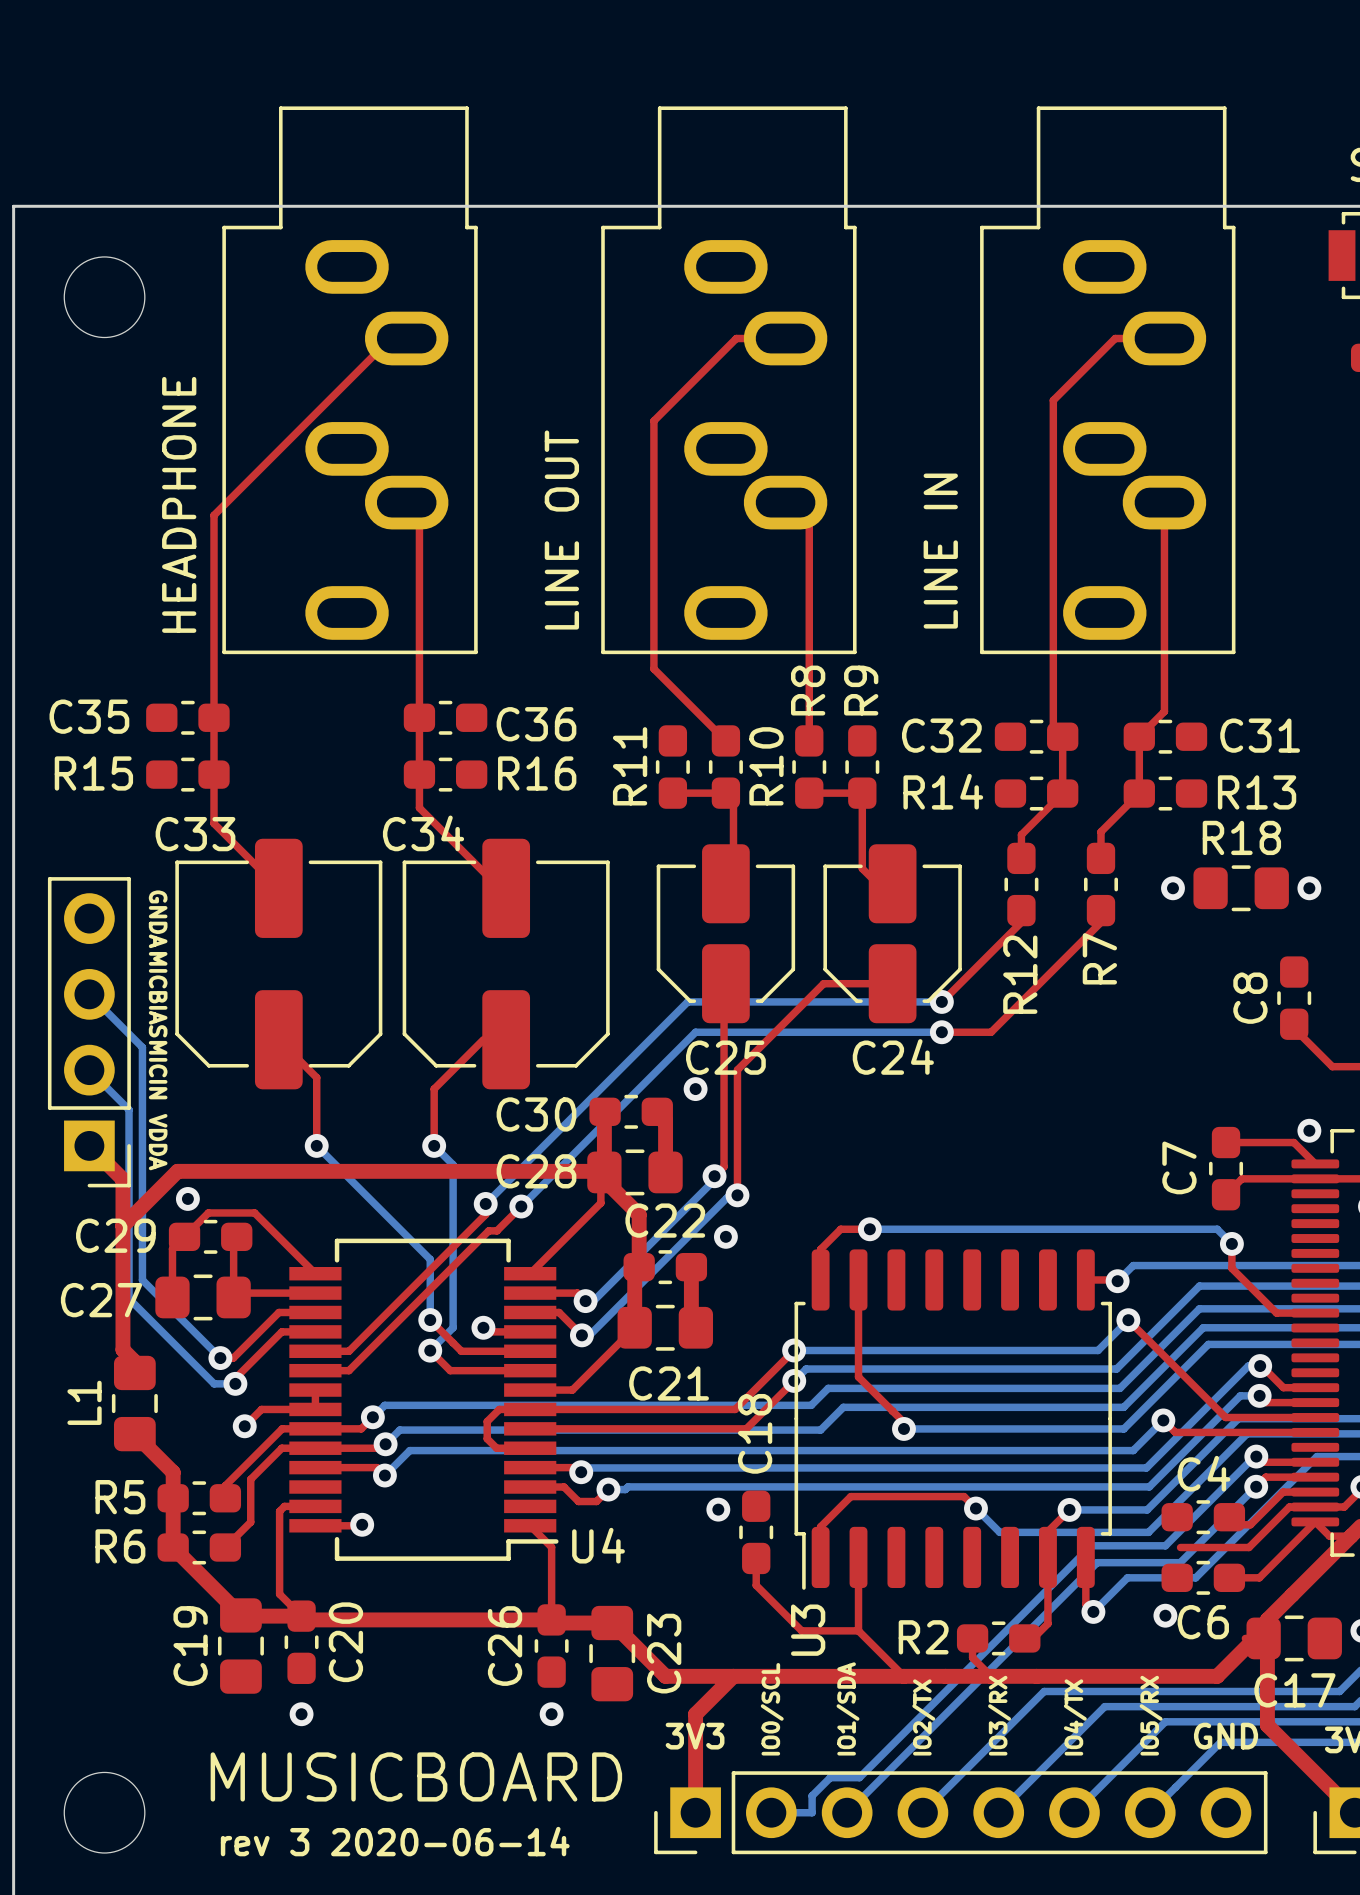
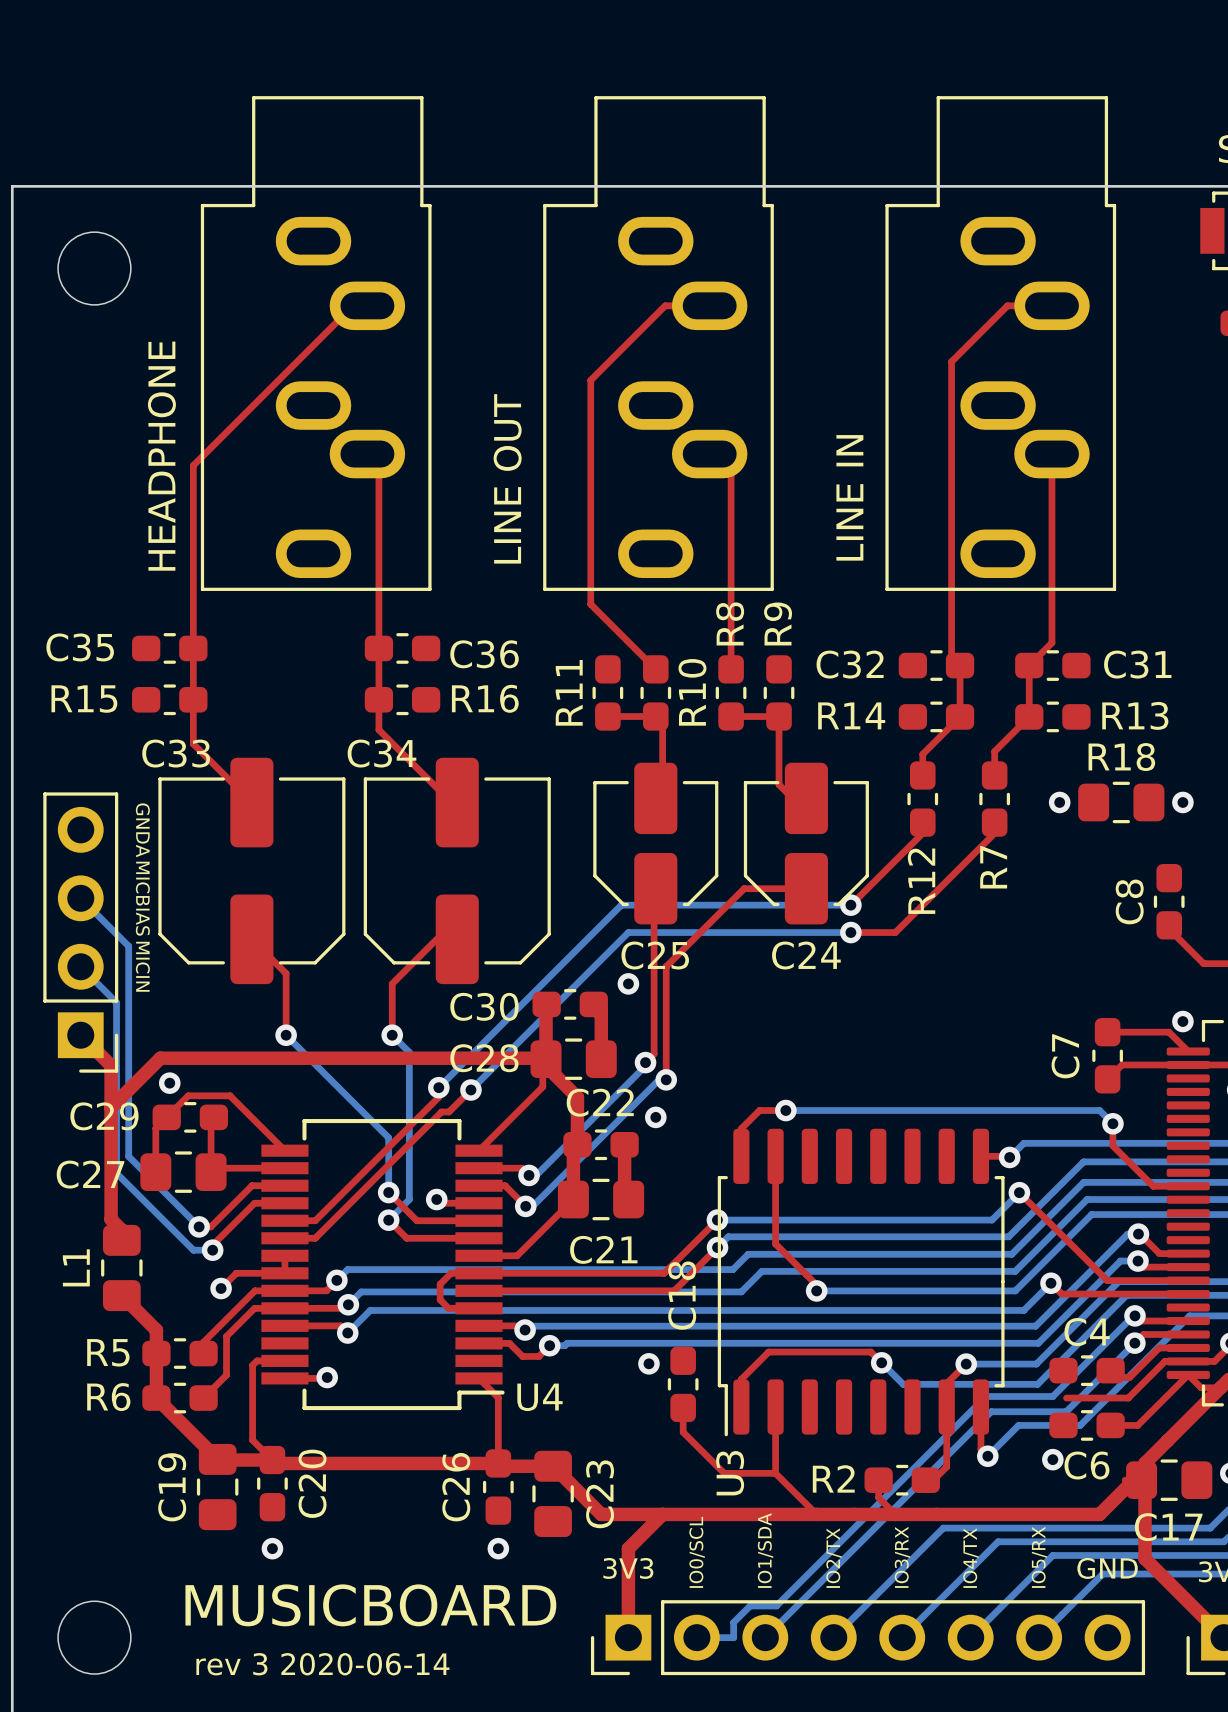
text: VDDA (158, 1142) -> none

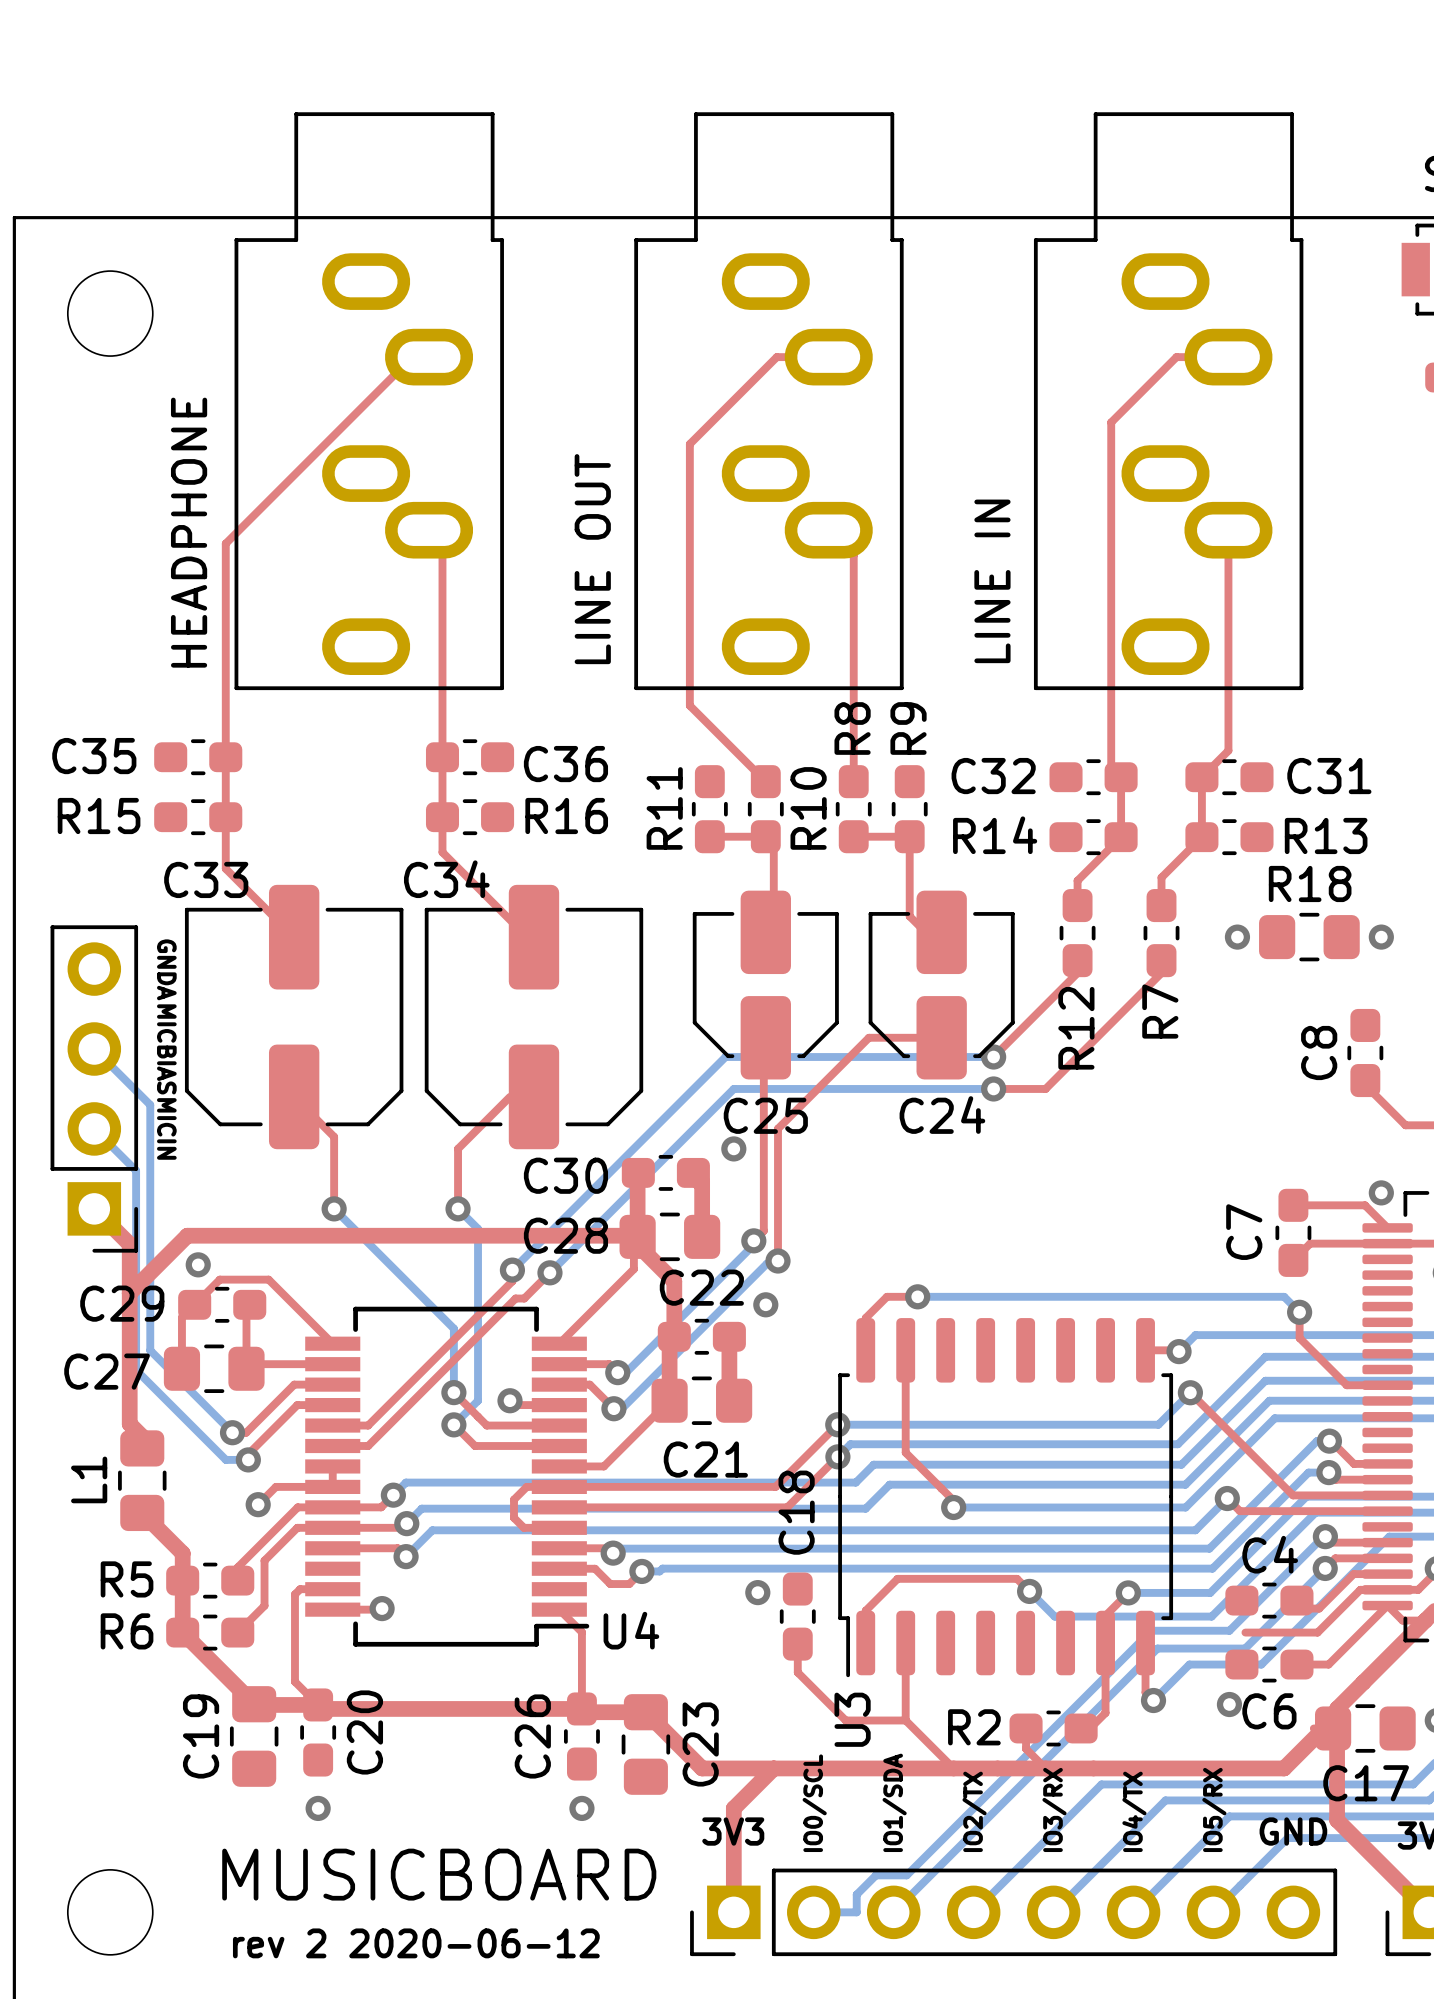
text: rev 3 2020-06-14 (322, 1664) -> rev 2 2020-06-12 (416, 1943)

